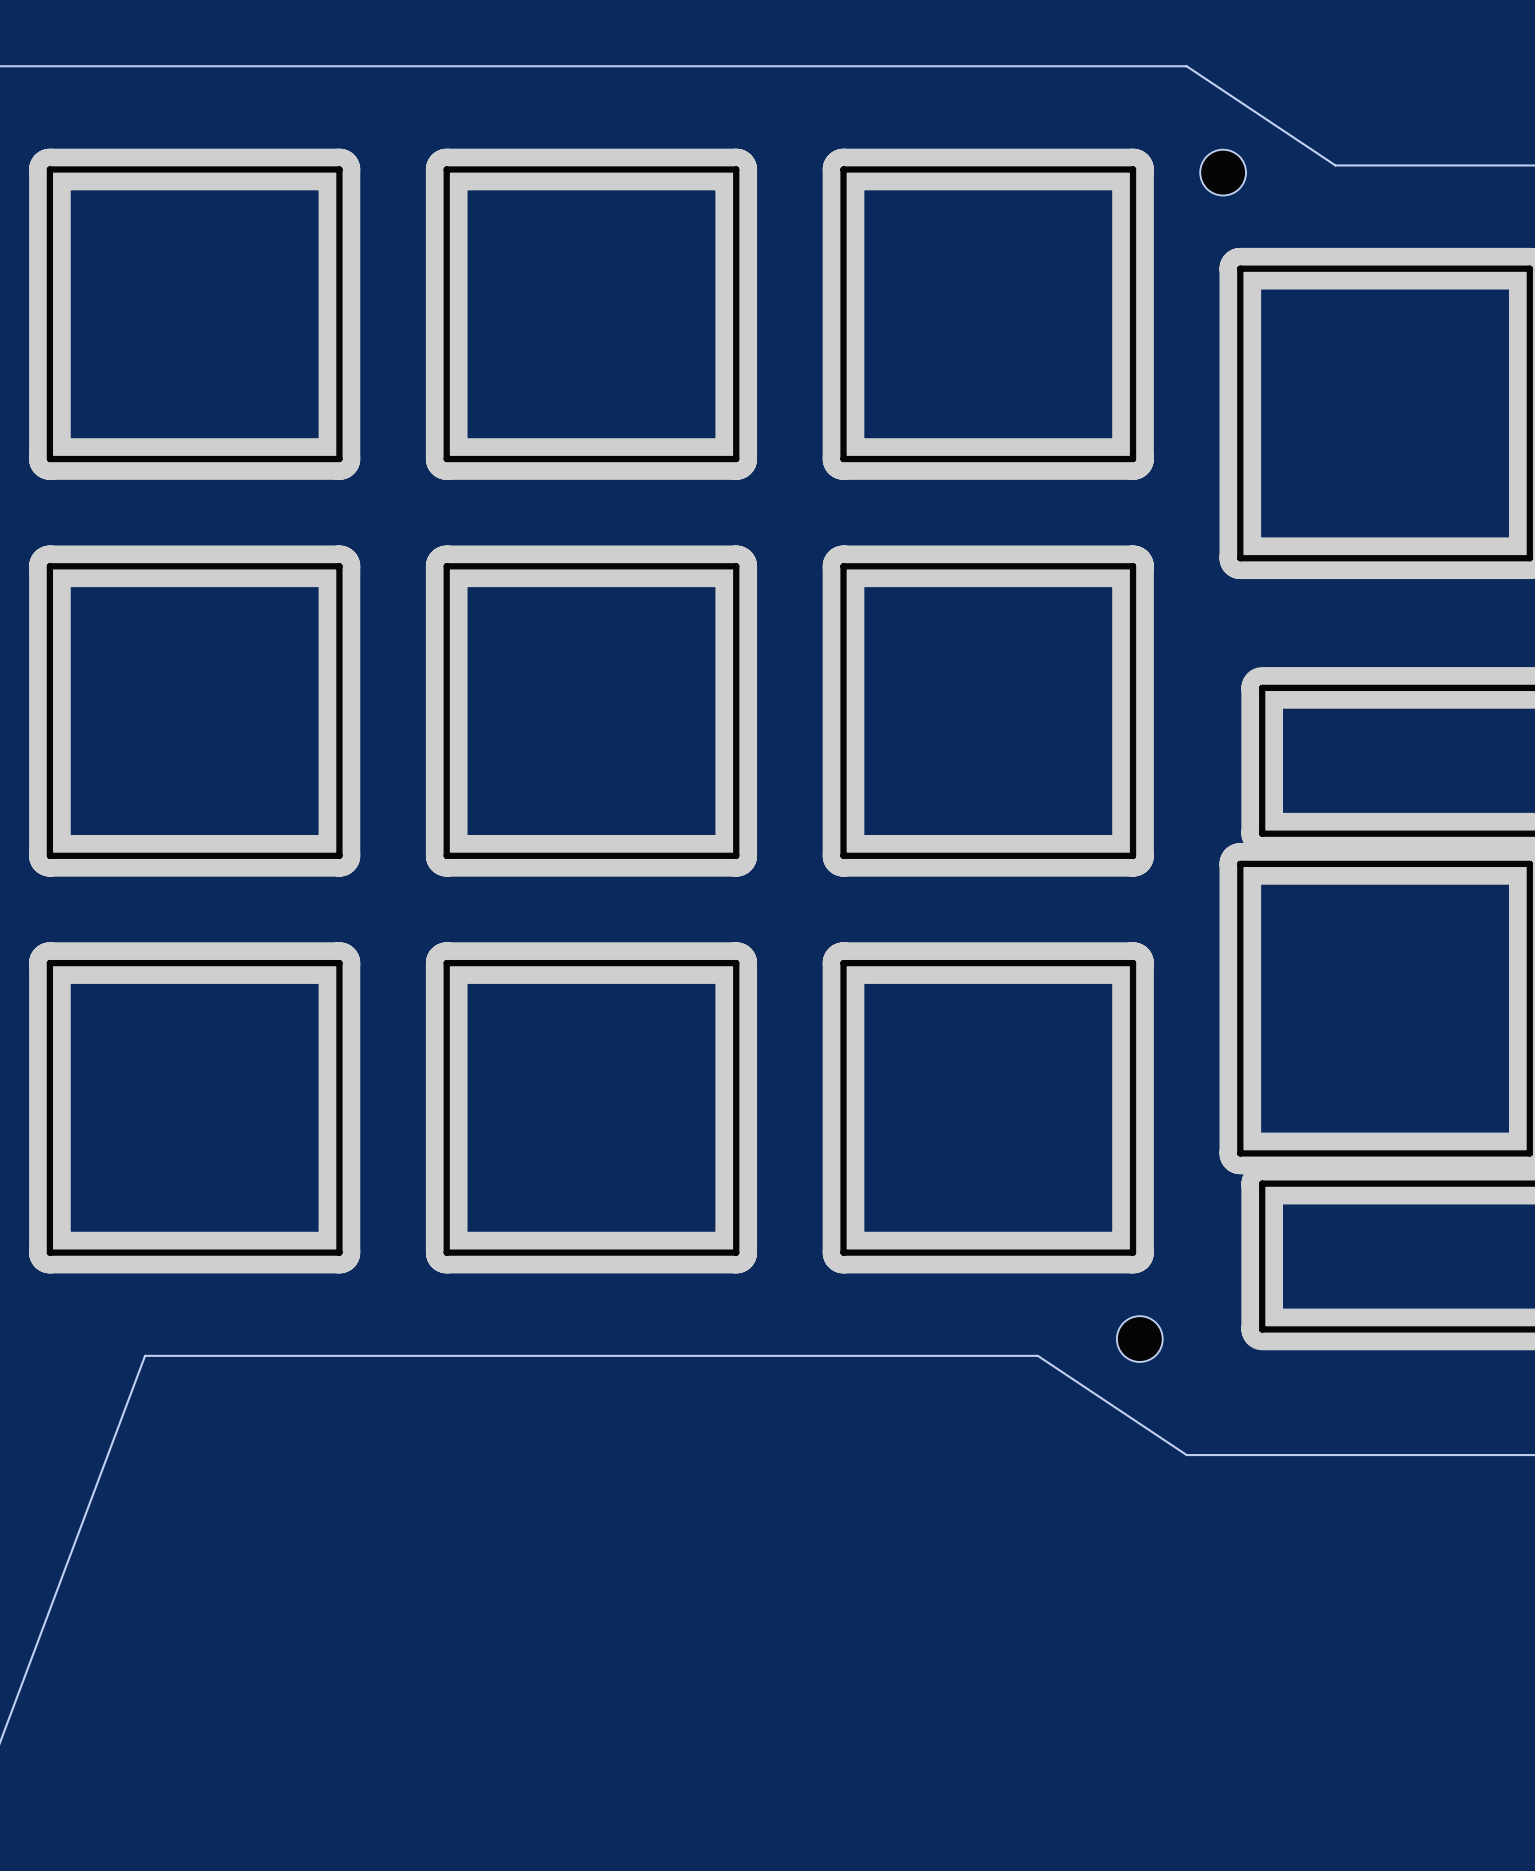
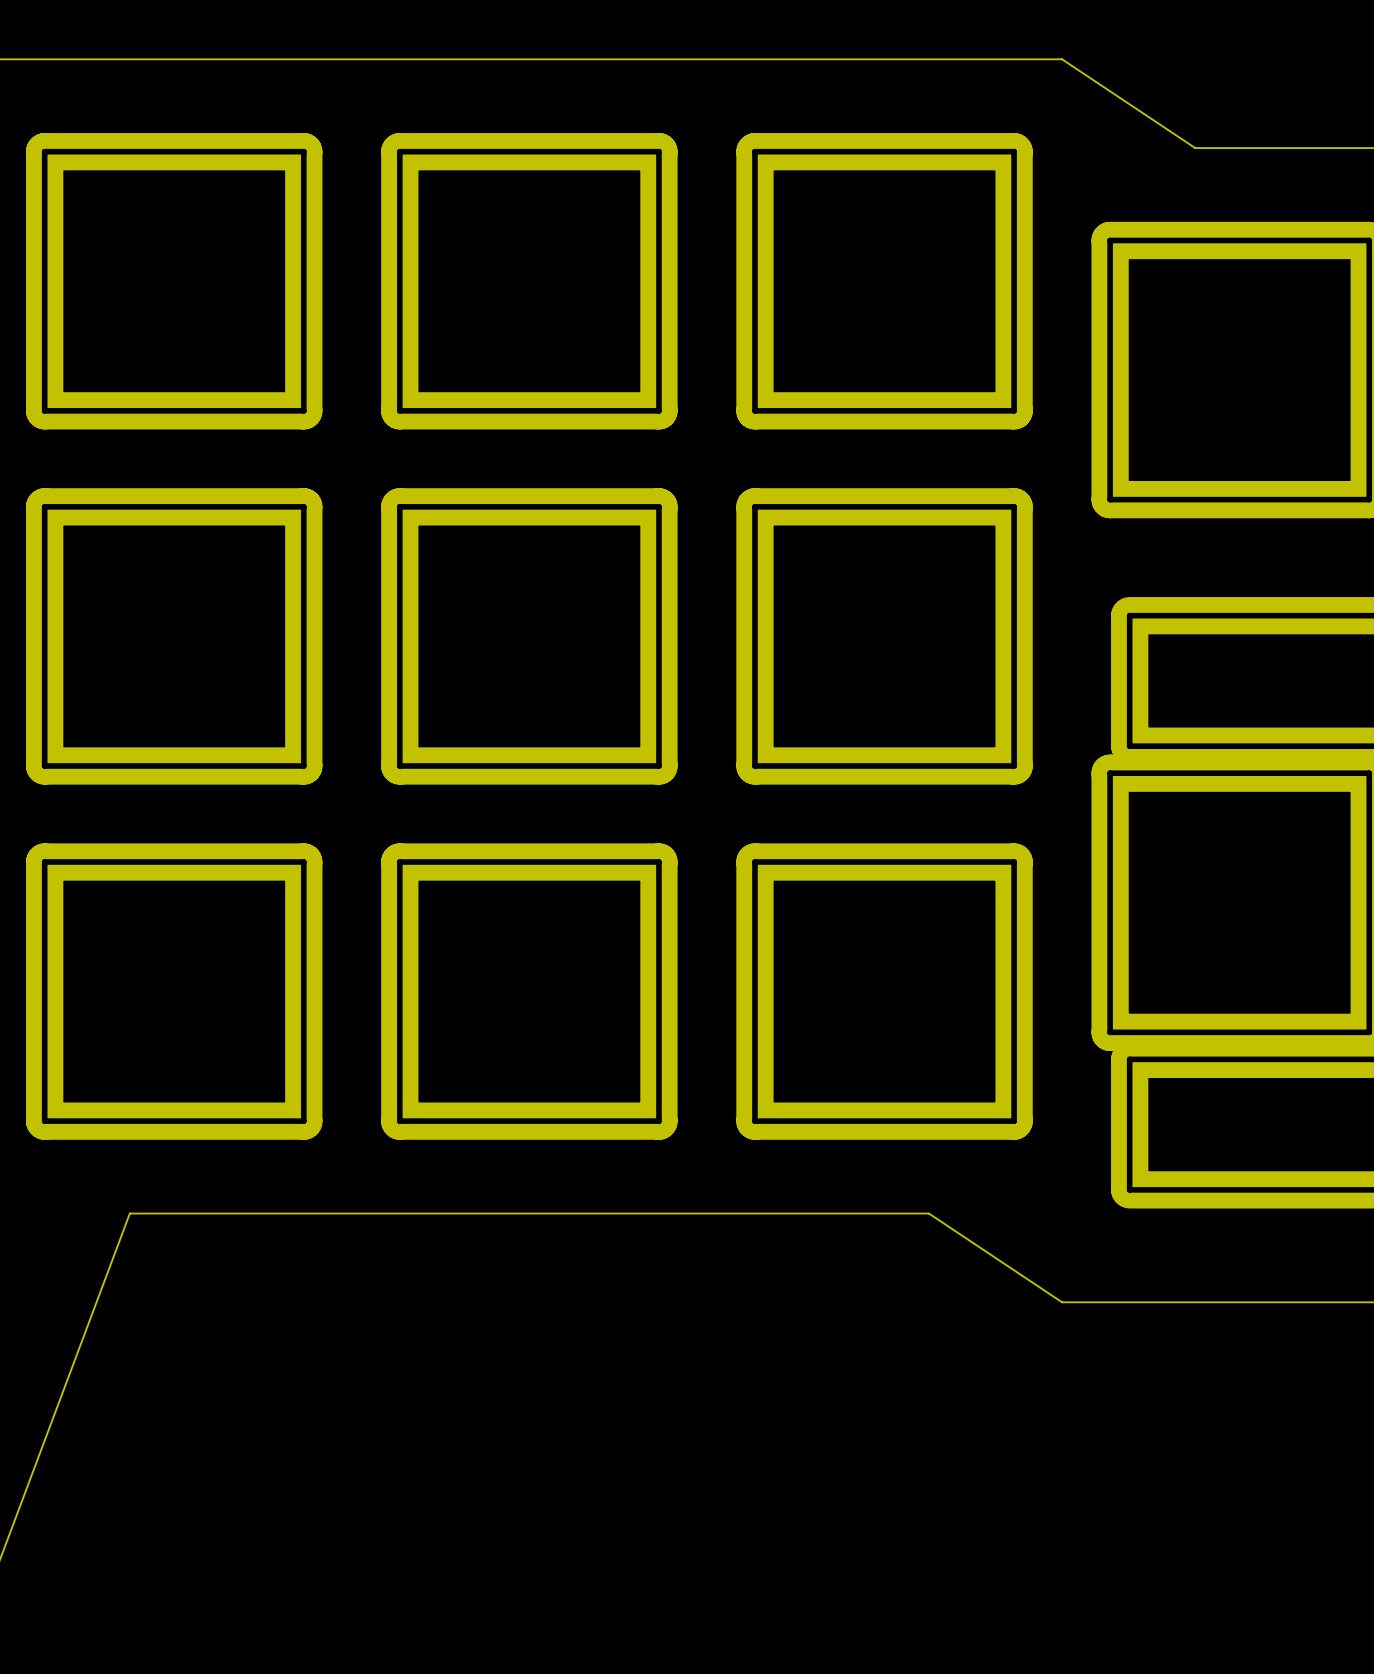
part: (1223, 172) -> none
part: (1139, 1339) -> none

